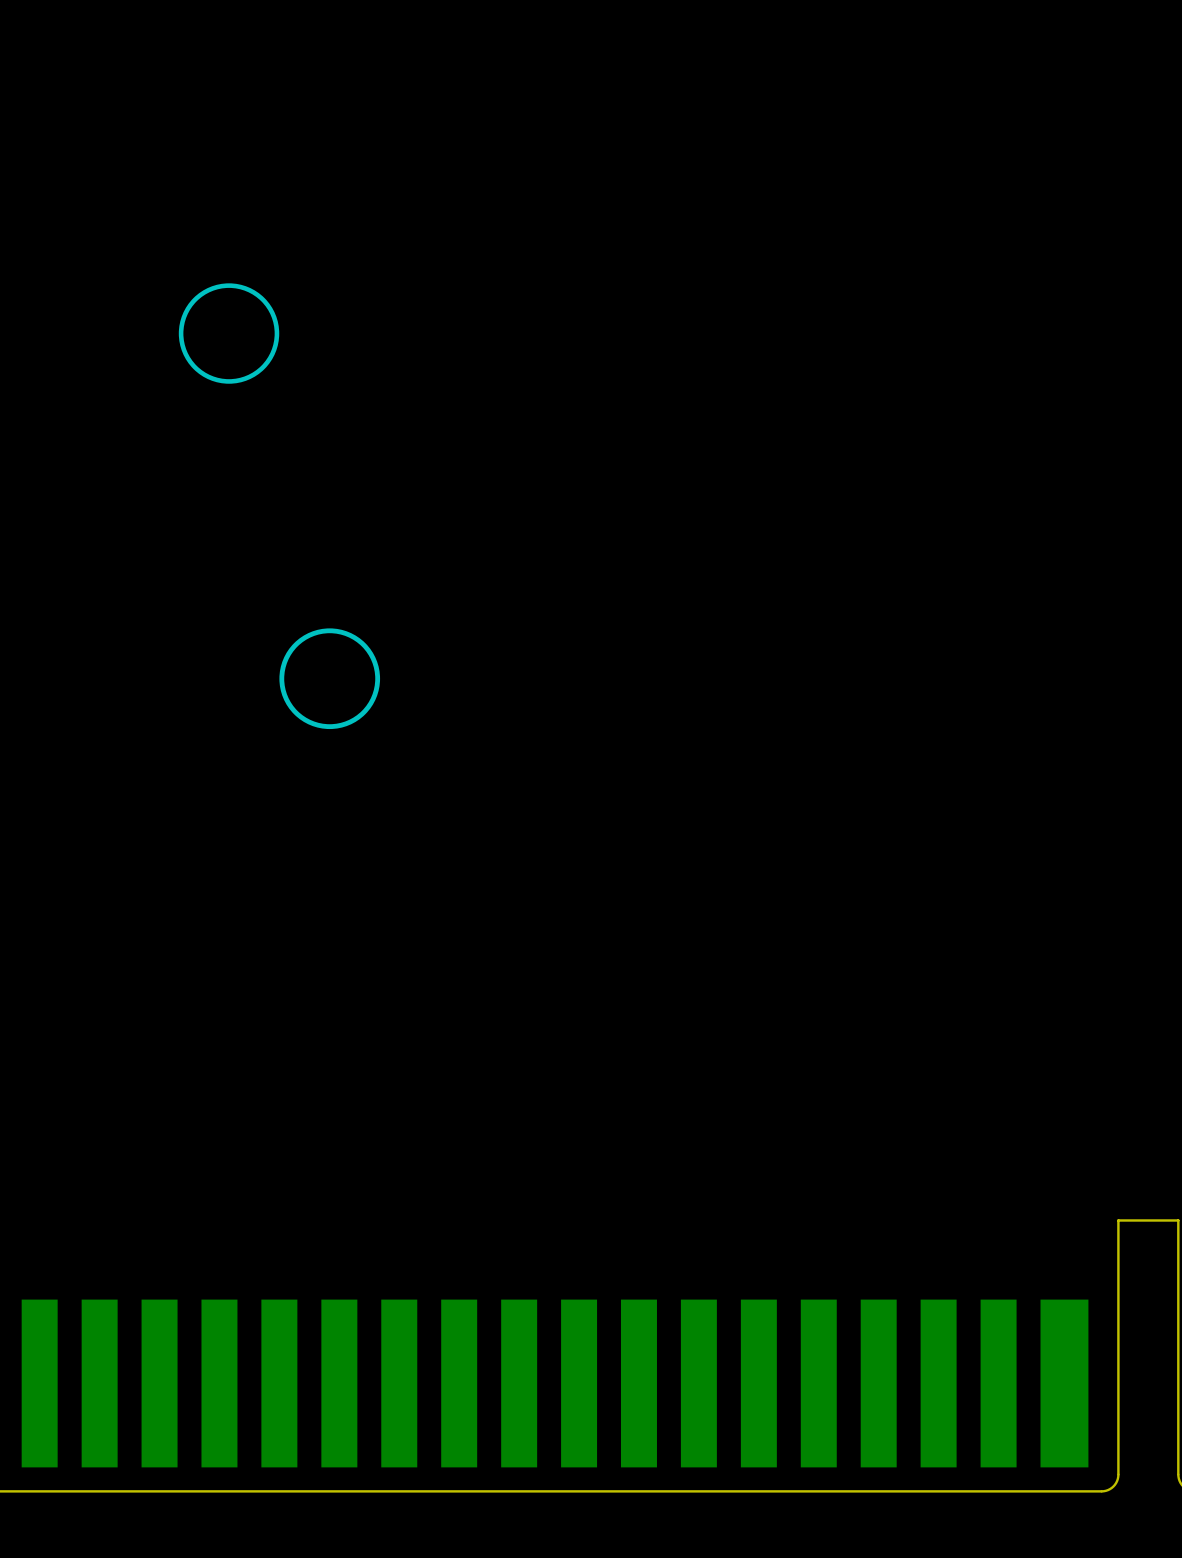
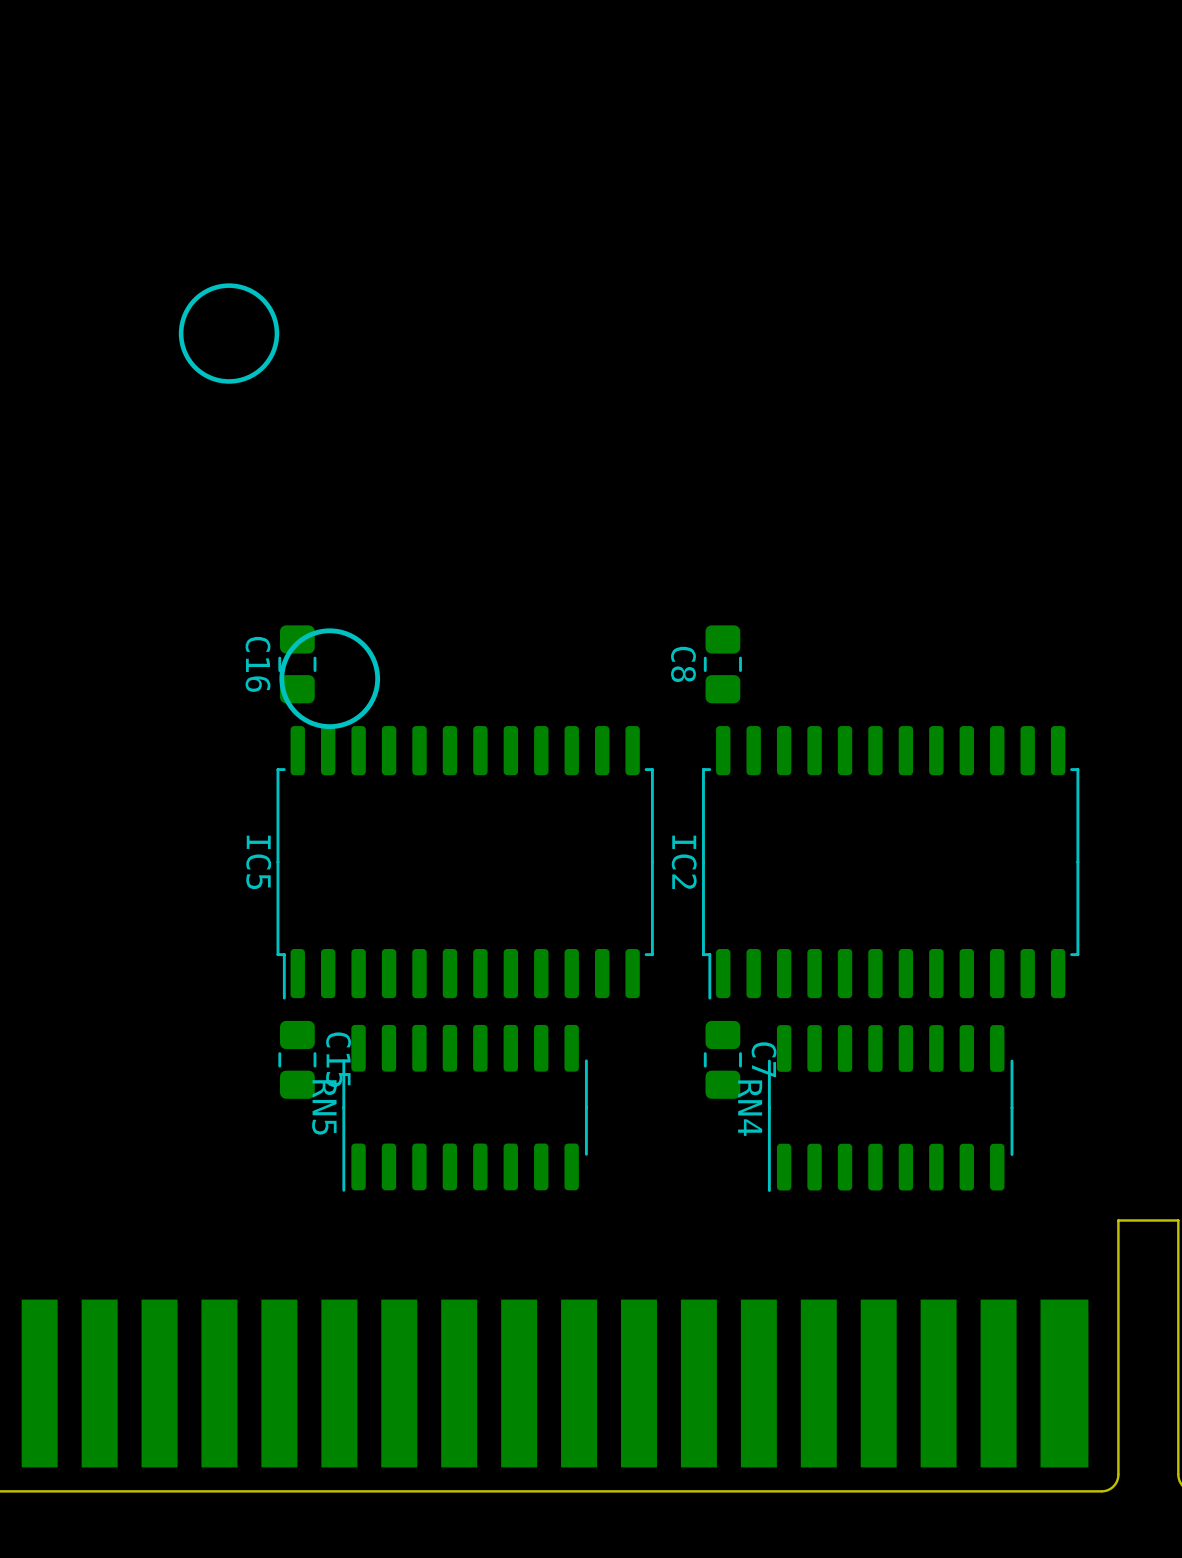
C16: none -> (297, 664)
C8: none -> (722, 664)
IC5: none -> (465, 862)
IC2: none -> (890, 862)
C15: none -> (297, 1059)
C7: none -> (722, 1059)
RN5: none -> (465, 1108)
RN4: none -> (890, 1108)

